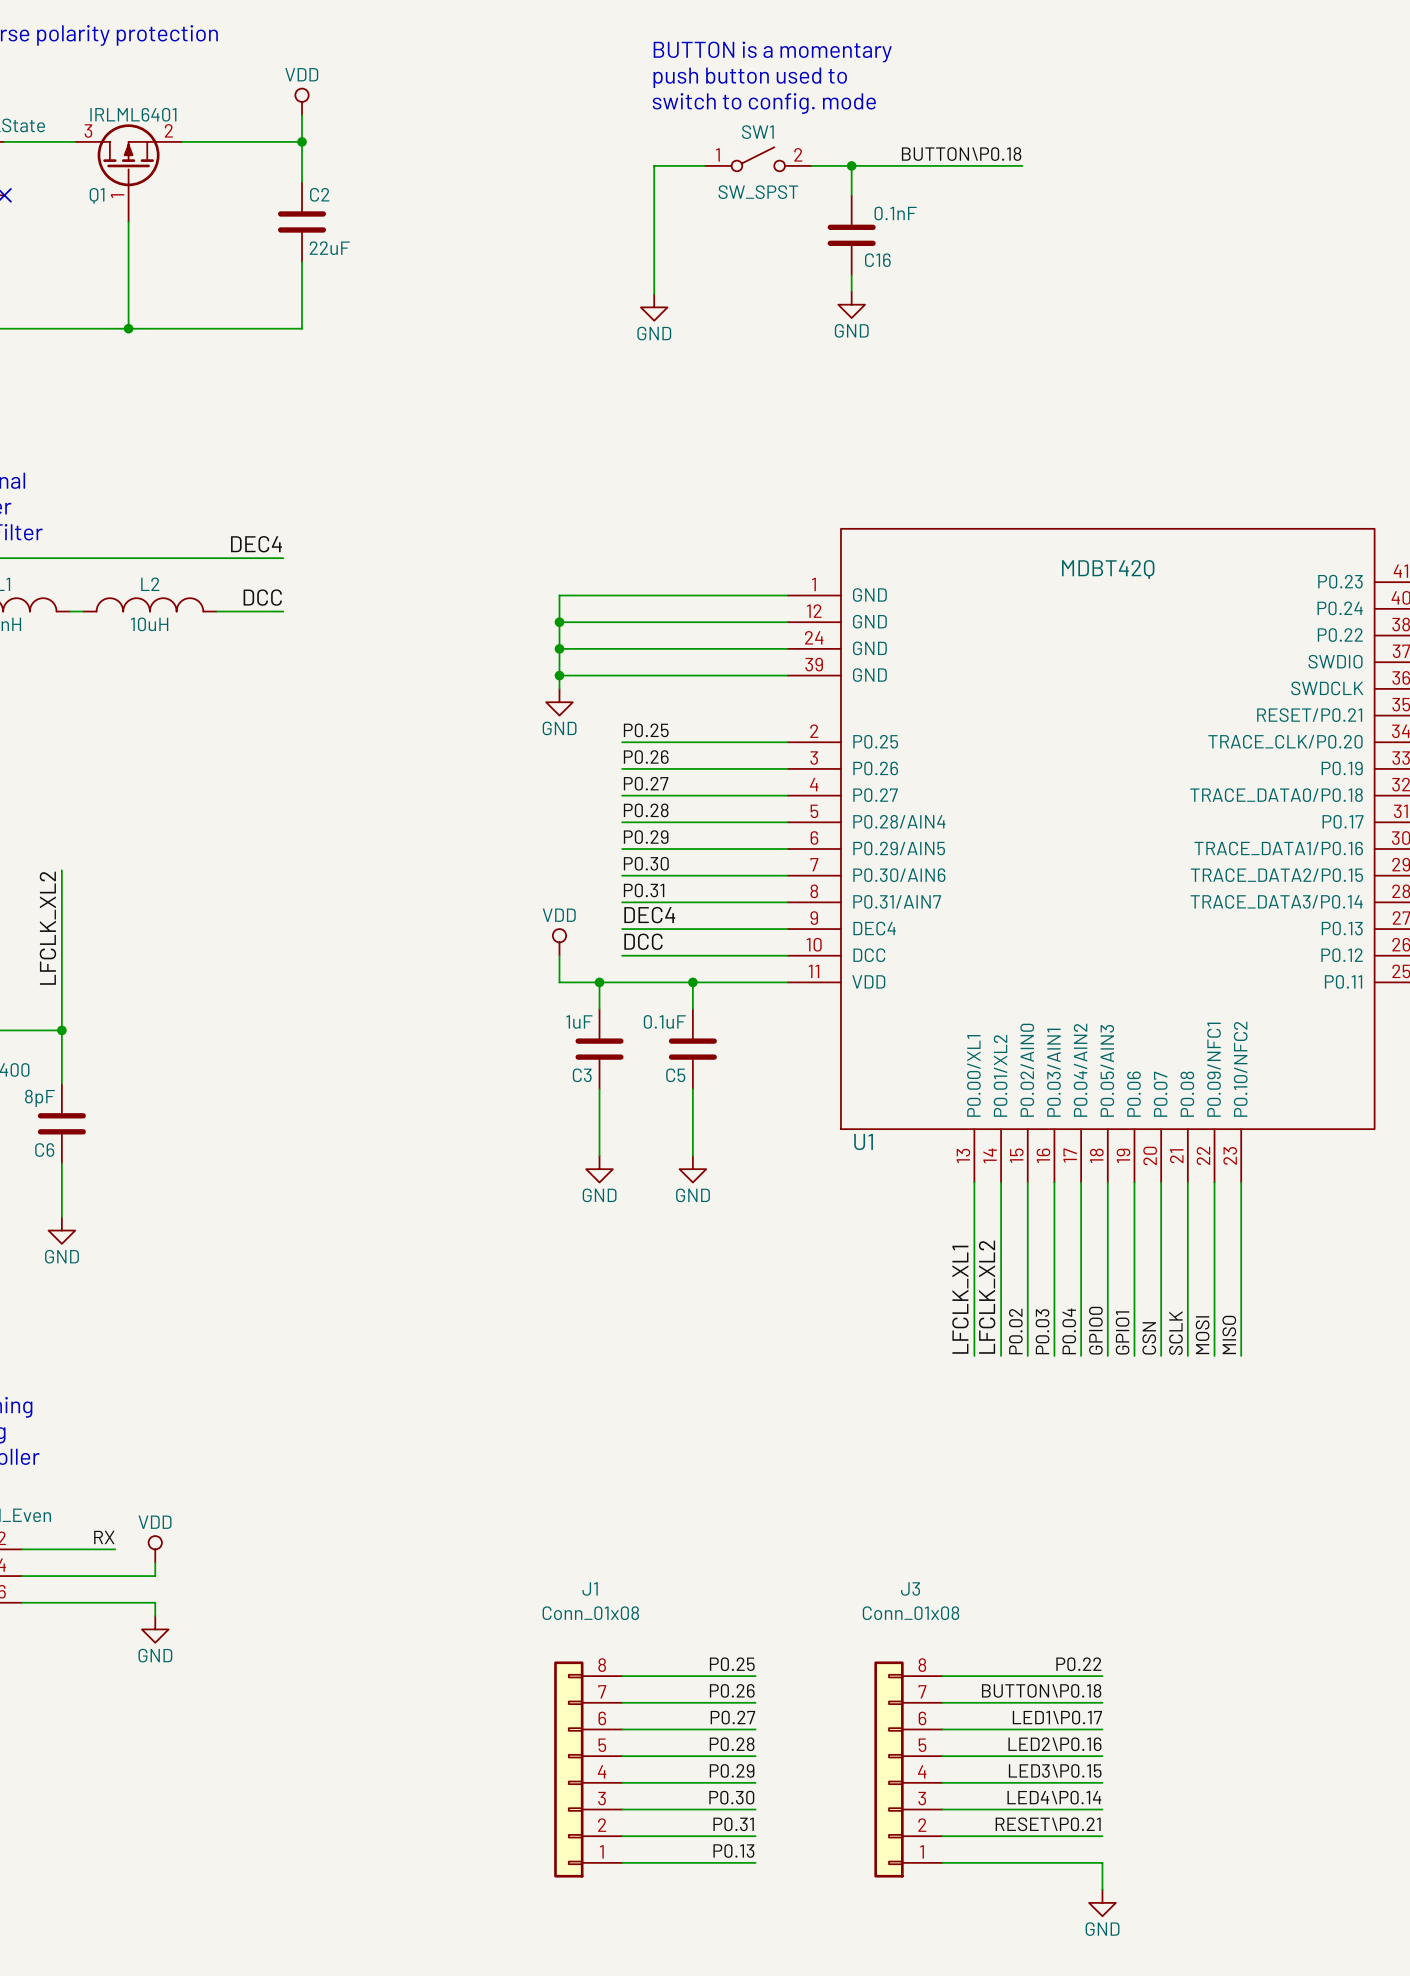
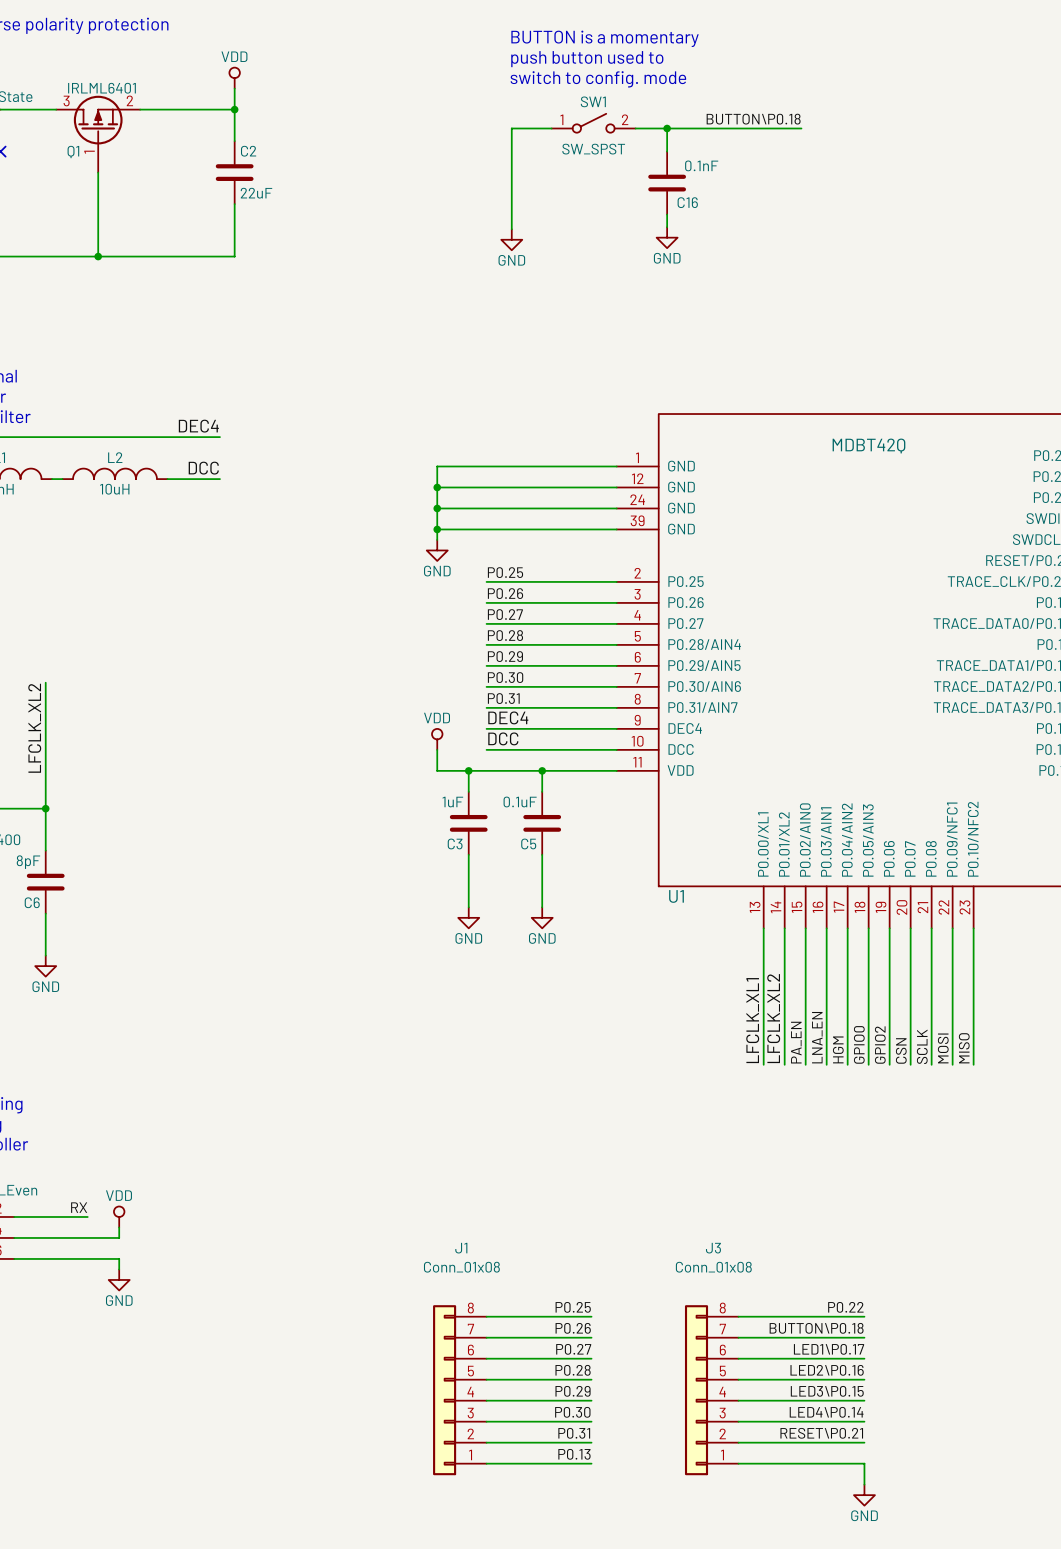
label: P0.02 (1015, 1331) -> PA_EN (796, 1042)
label: P0.03 (1042, 1331) -> LNA_EN (817, 1037)
label: P0.04 (1069, 1331) -> HGM (838, 1049)
label: GPIO1 (1122, 1332) -> GPIO2 (880, 1045)

